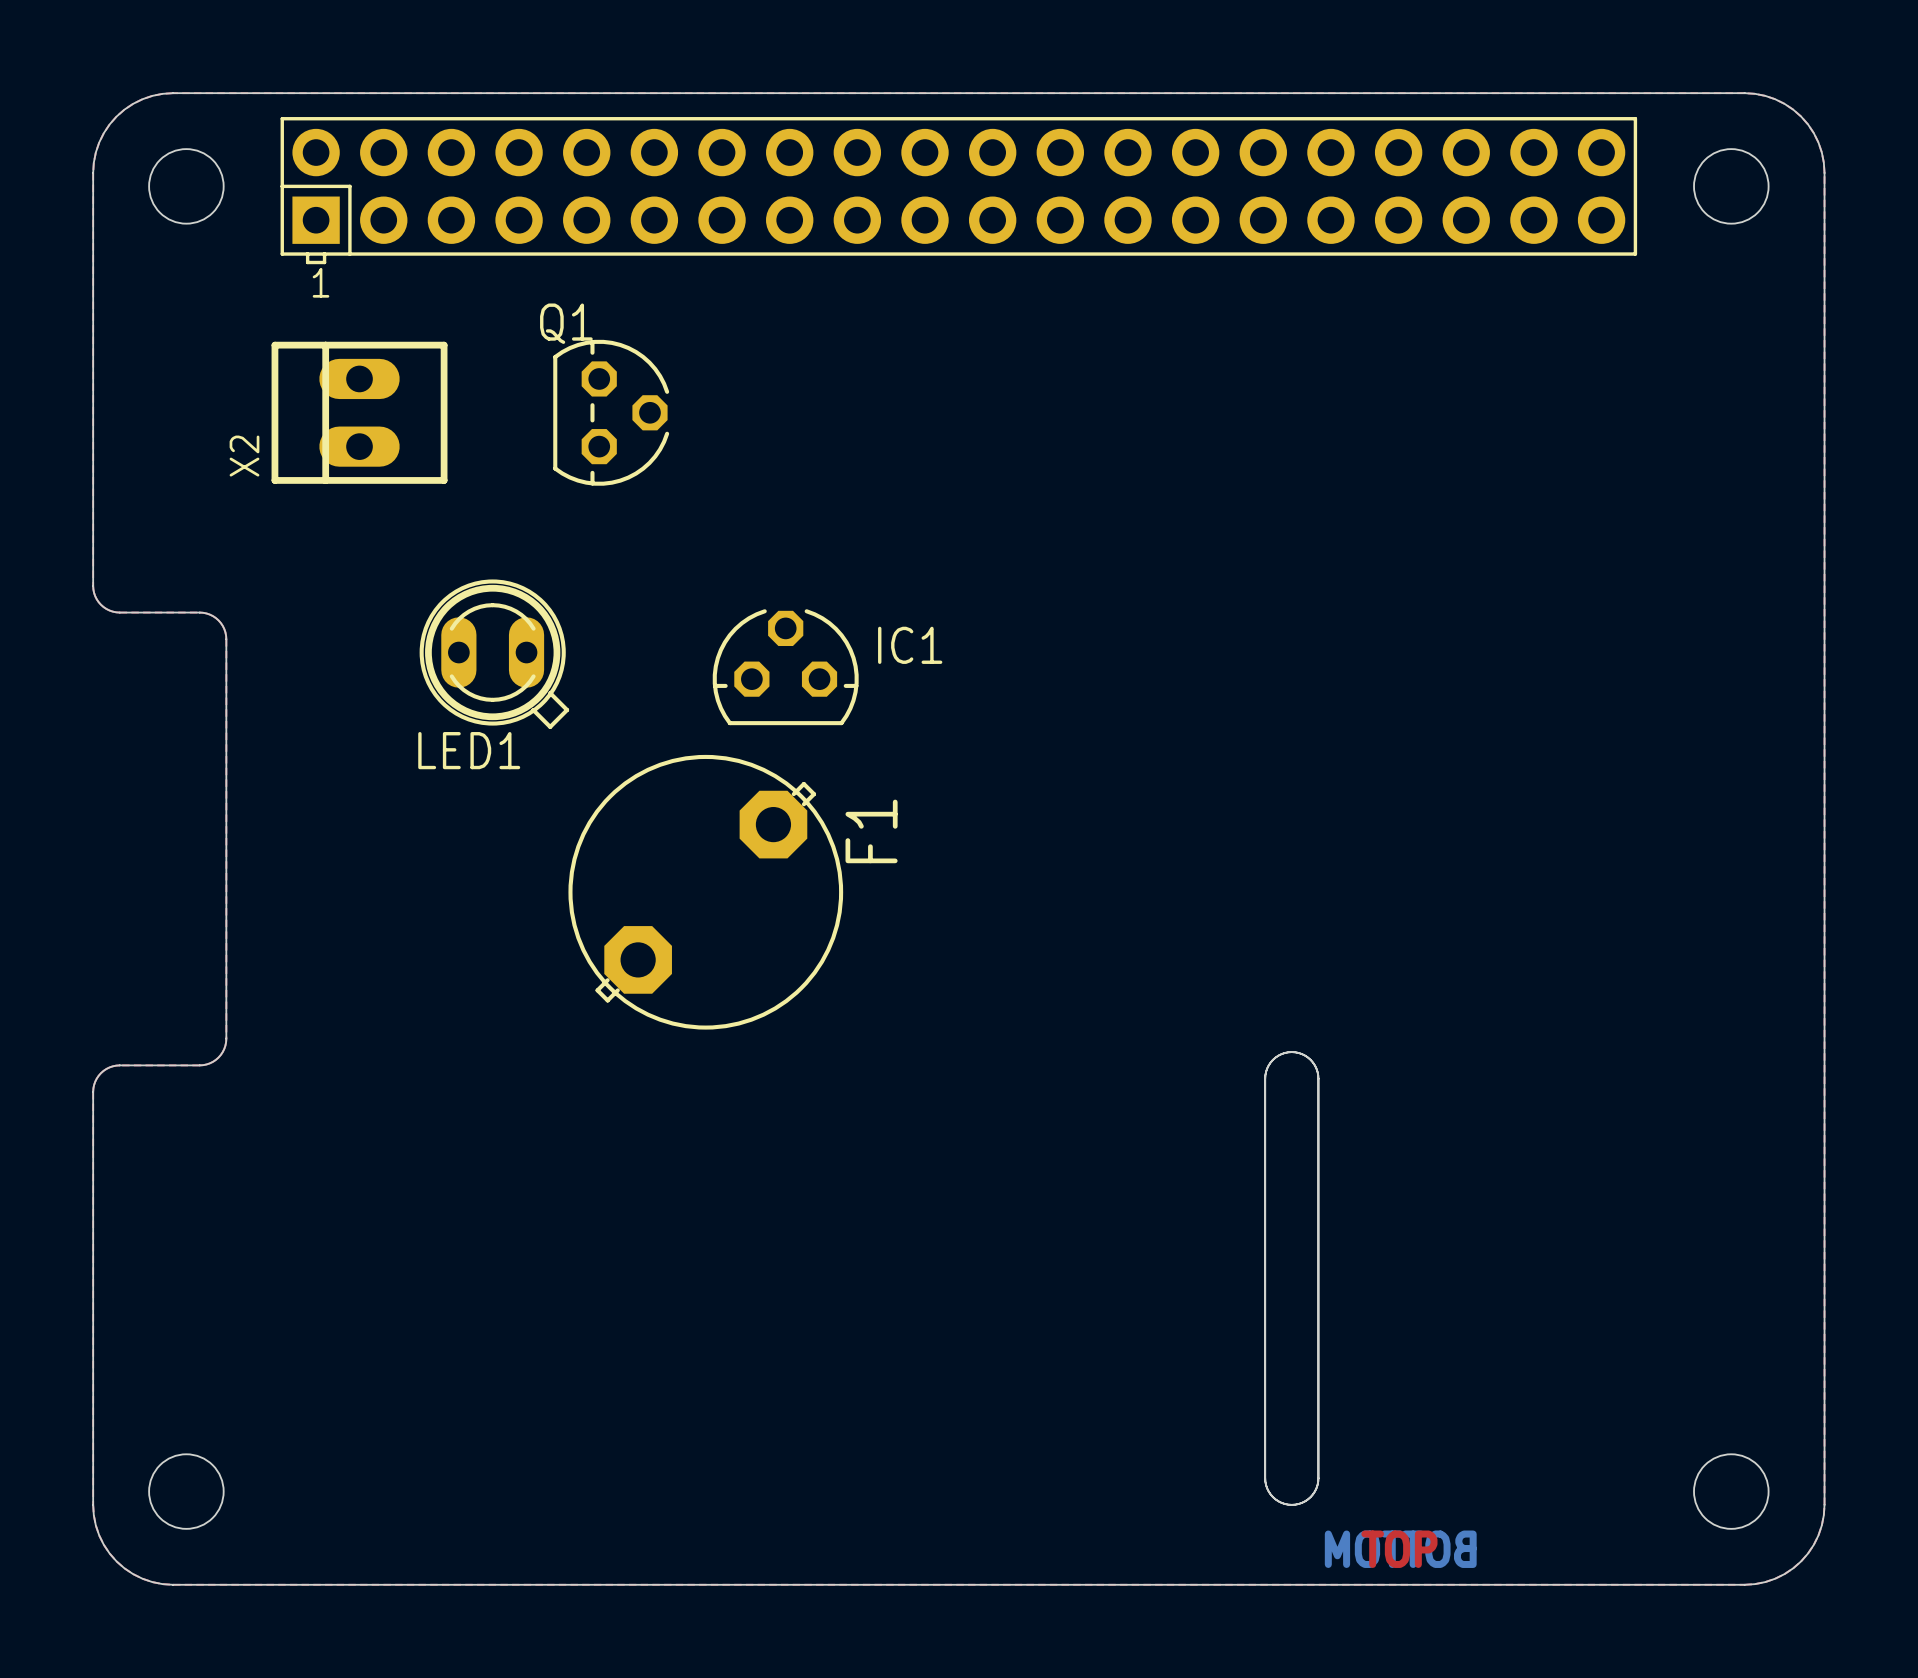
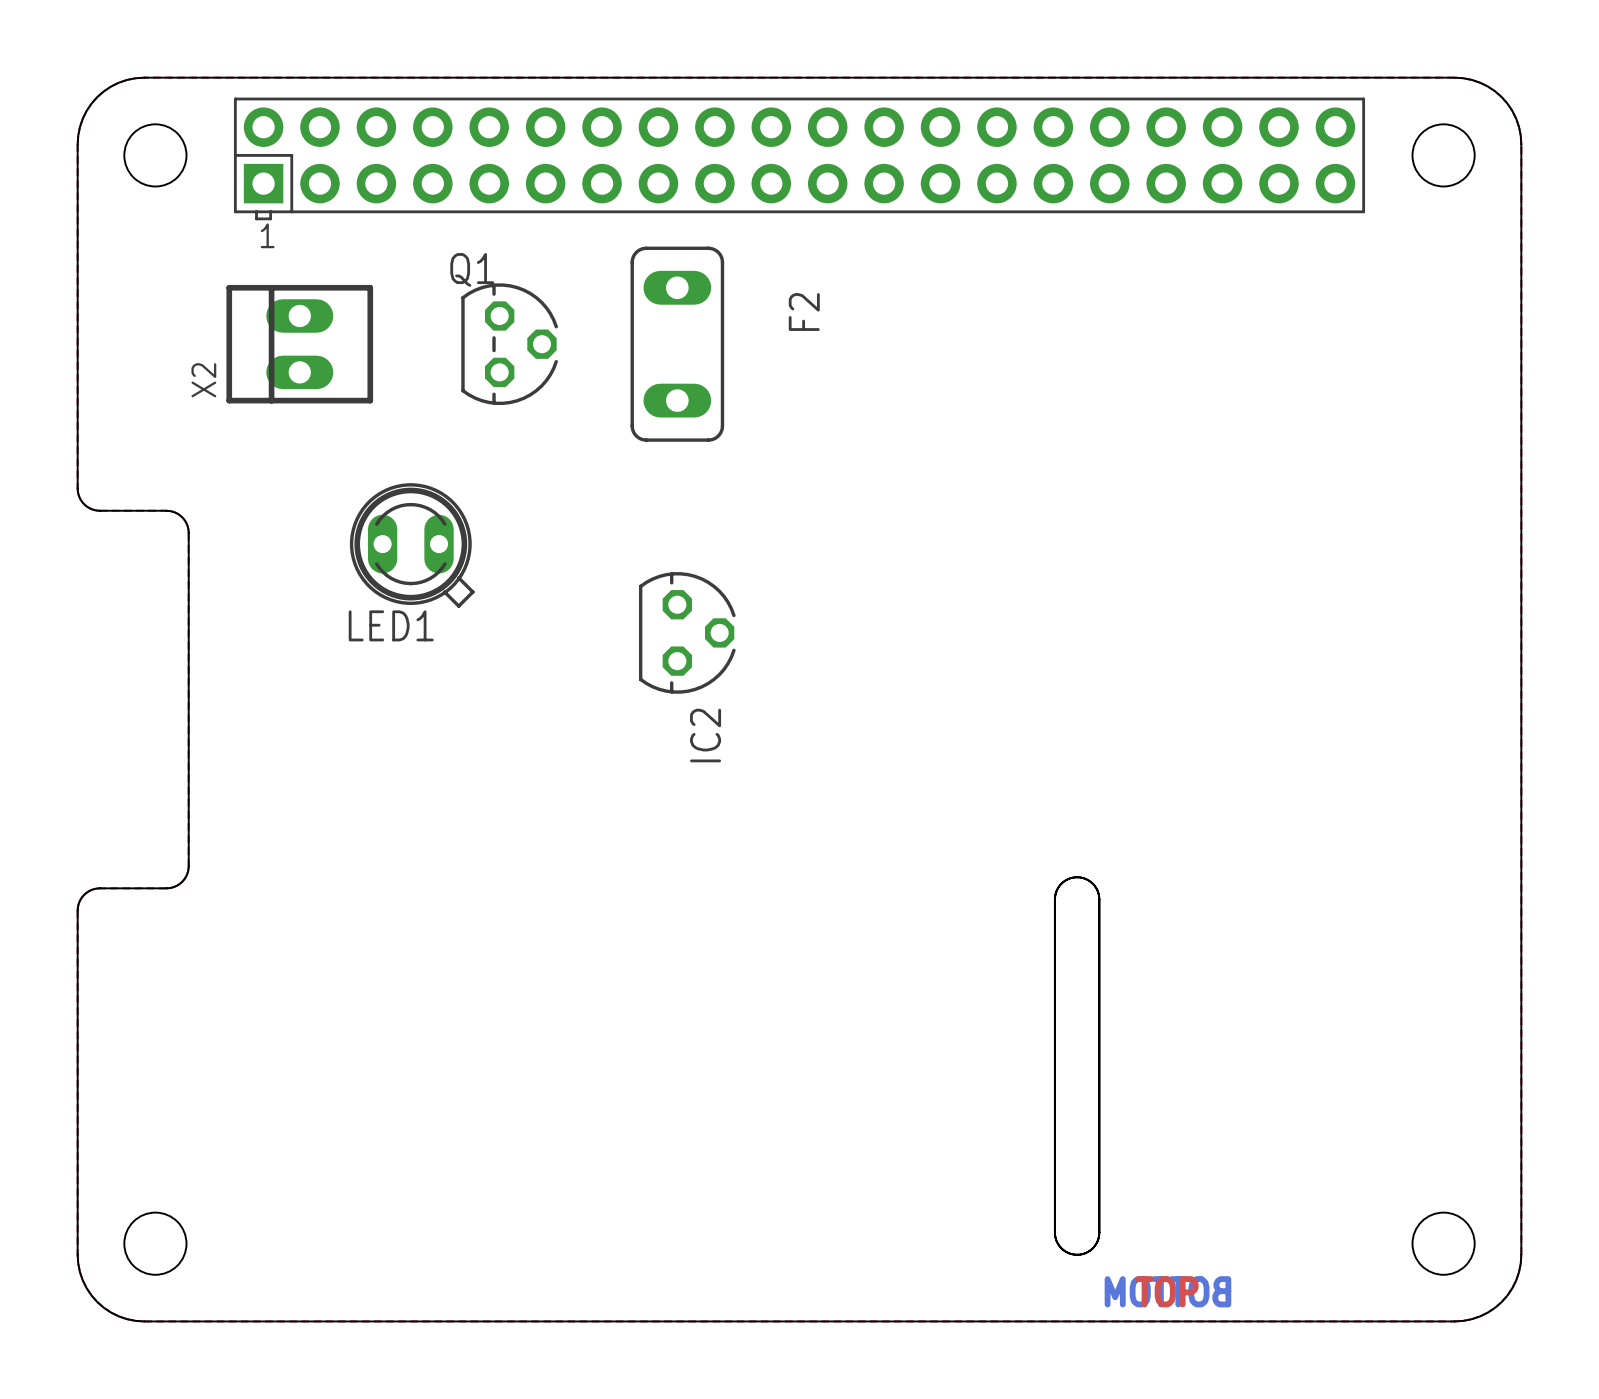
F2: none -> (677, 344)
IC1: (785, 667) -> none
IC2: none -> (687, 632)
F1: (705, 892) -> none

